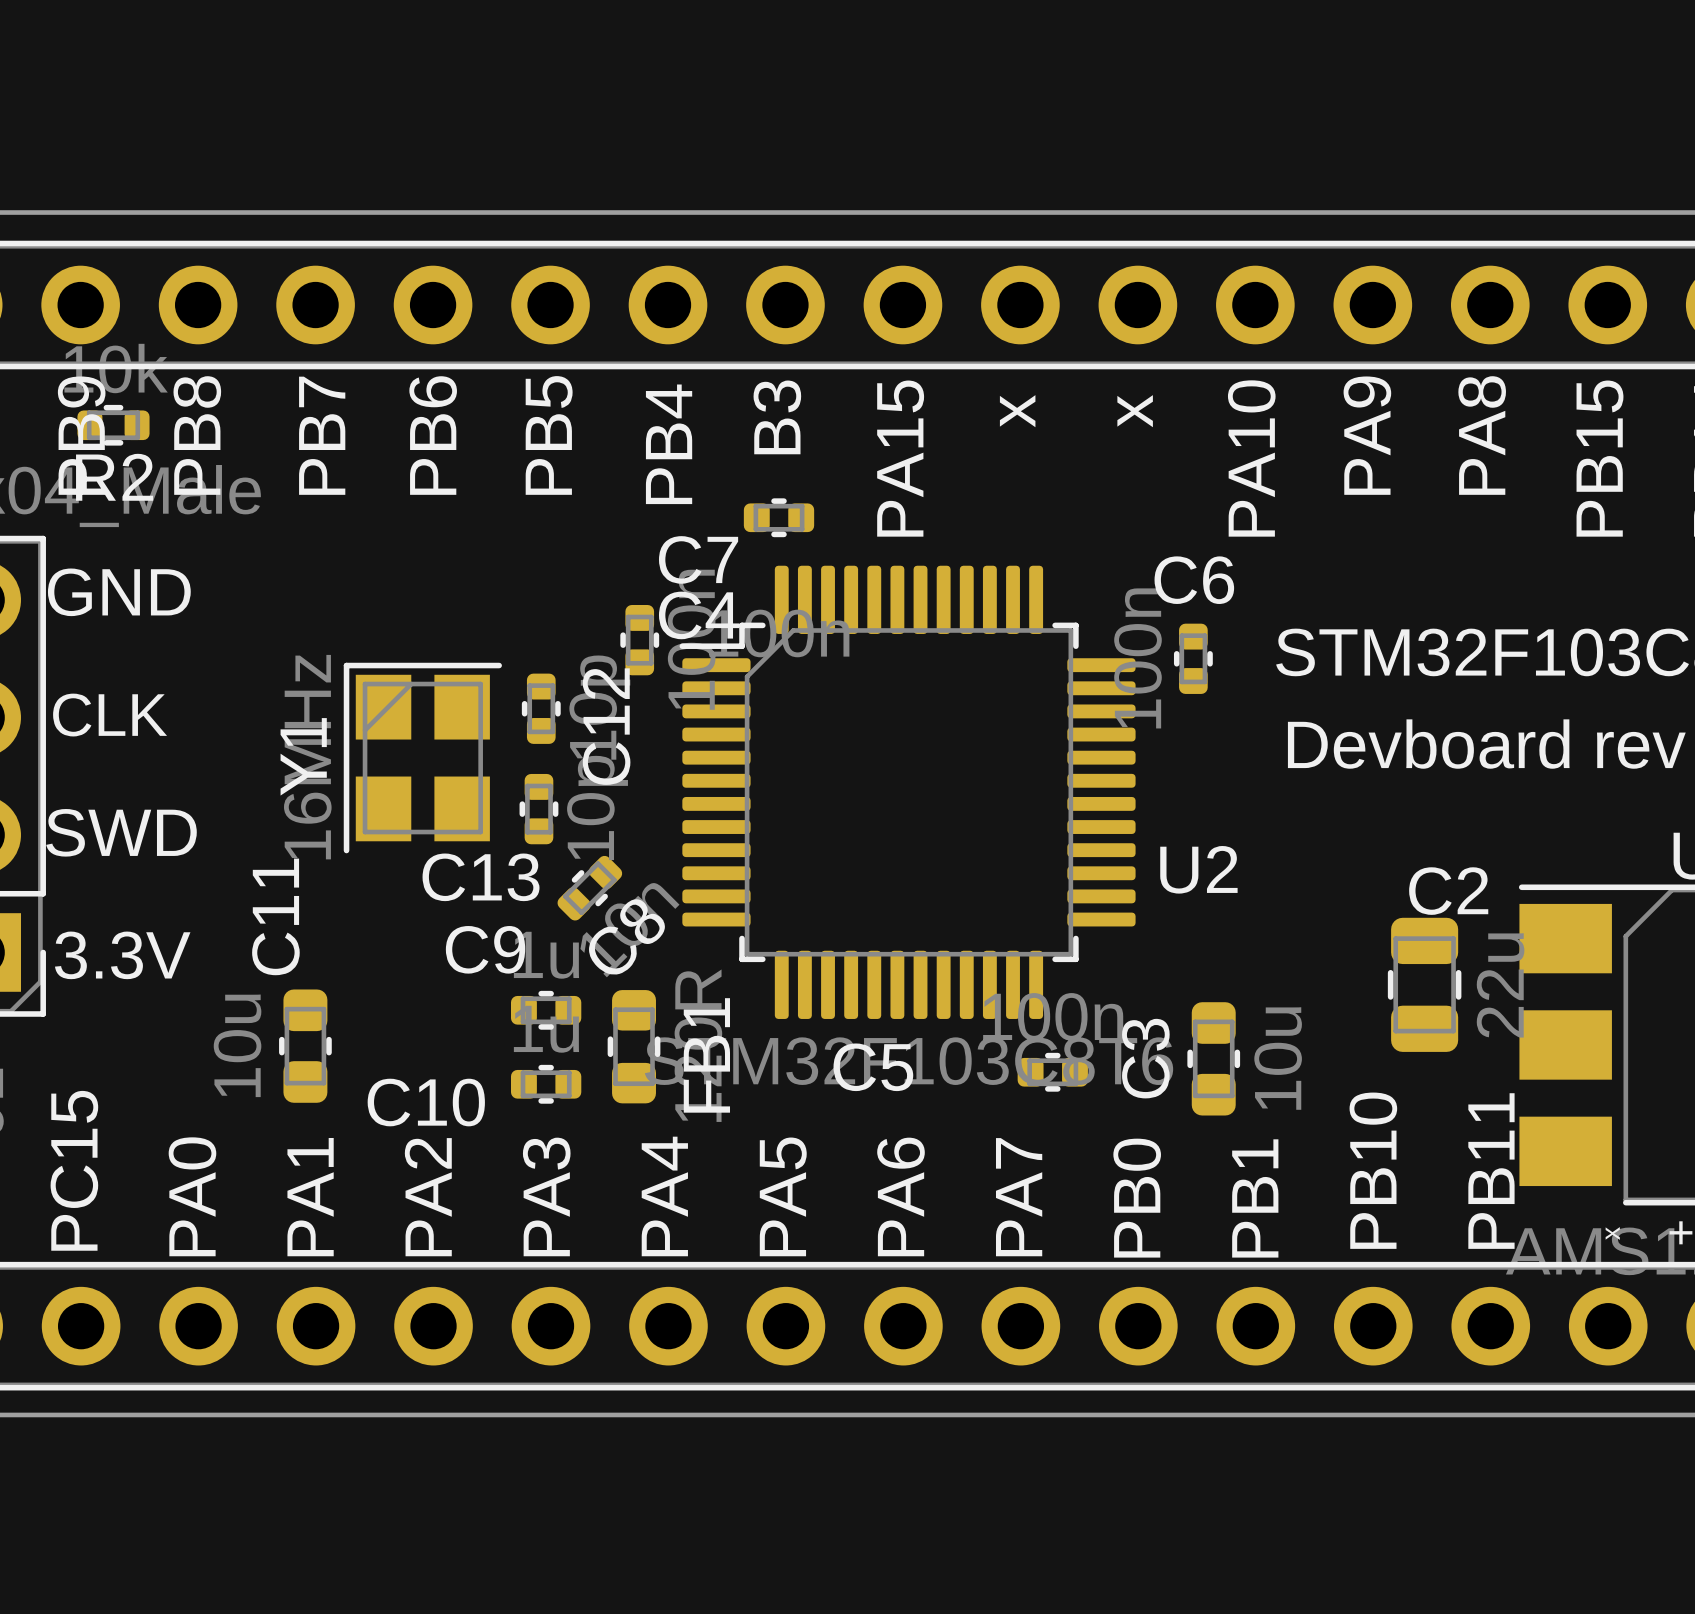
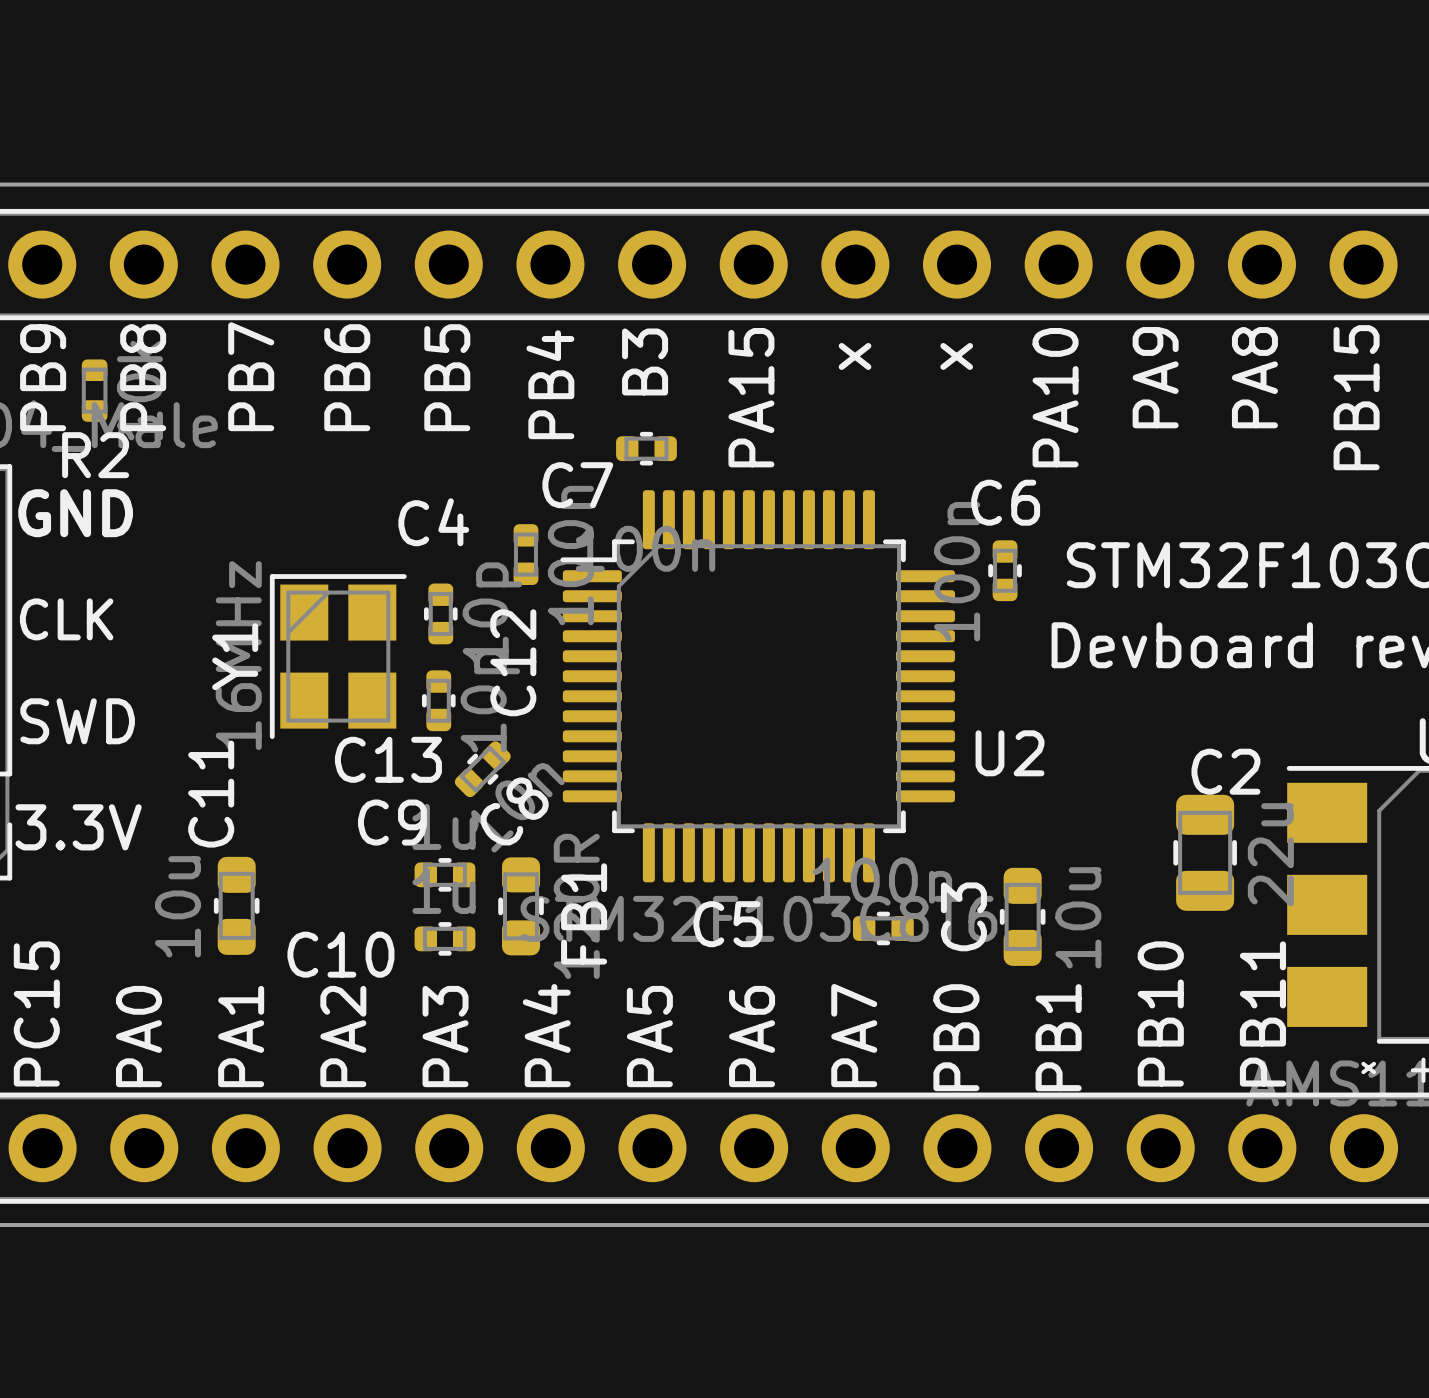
R2 footprint: [77, 404, 150, 446] -> [81, 359, 108, 422]
C4 footprint: [620, 604, 660, 676] -> [513, 524, 539, 585]
C4 name position: C4 (699, 615) -> C4 (433, 522)
C12 name position: C12 (606, 726) -> C12 (513, 662)

